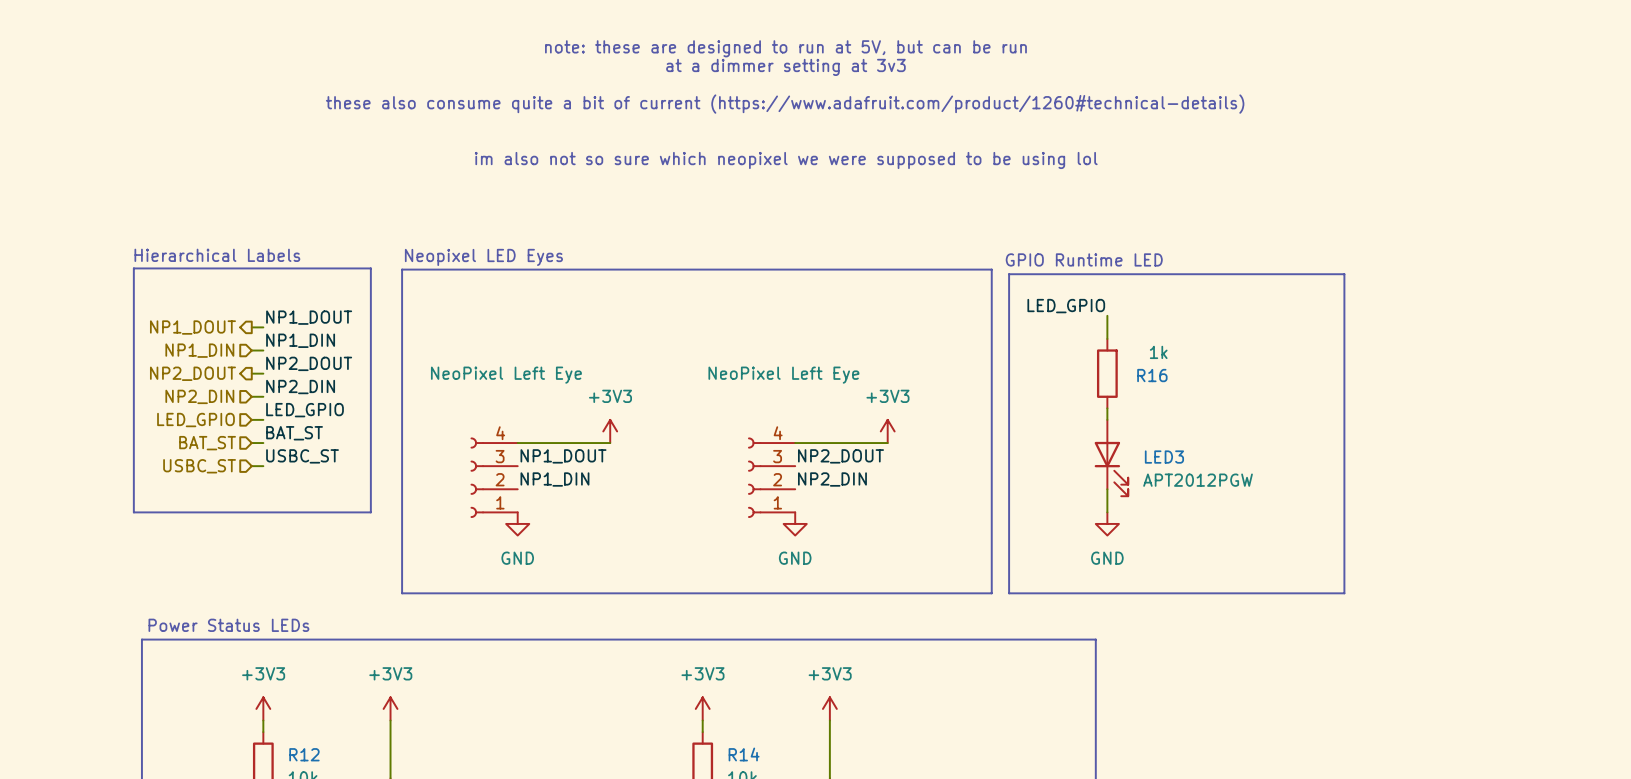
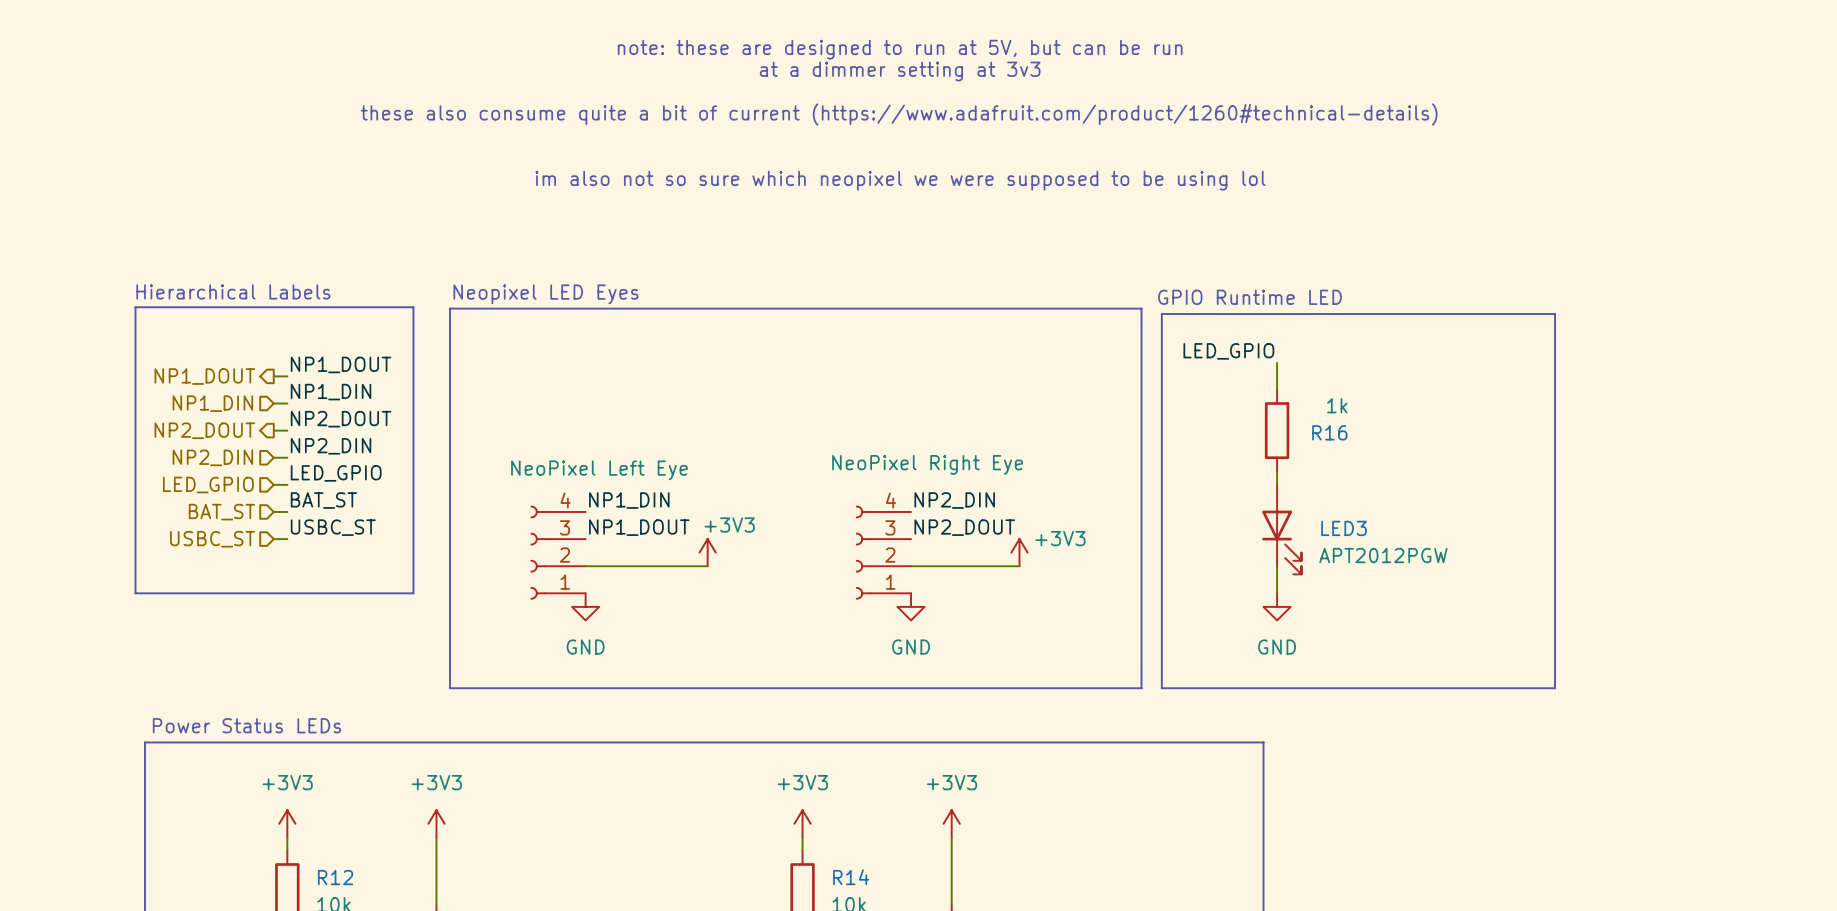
part value position: NeoPixel Left Eye (506, 375) -> NeoPixel Left Eye (599, 470)
part value: NeoPixel Left Eye (783, 375) -> NeoPixel Right Eye (927, 464)
power symbol text position: +3V3 (610, 396) -> +3V3 (729, 525)
power symbol text position: +3V3 (887, 396) -> +3V3 (1060, 538)
power symbol position: +3V3 (610, 431) -> +3V3 (707, 552)
power symbol position: +3V3 (887, 431) -> +3V3 (1019, 552)
wire: (517, 443) (610, 443) -> none
wire: (795, 443) (887, 443) -> (911, 566) (1019, 566)
label position: NP1_DIN (554, 479) -> NP1_DIN (629, 500)
label position: NP2_DIN (832, 479) -> NP2_DIN (954, 500)
wire: none -> (585, 566) (707, 566)

